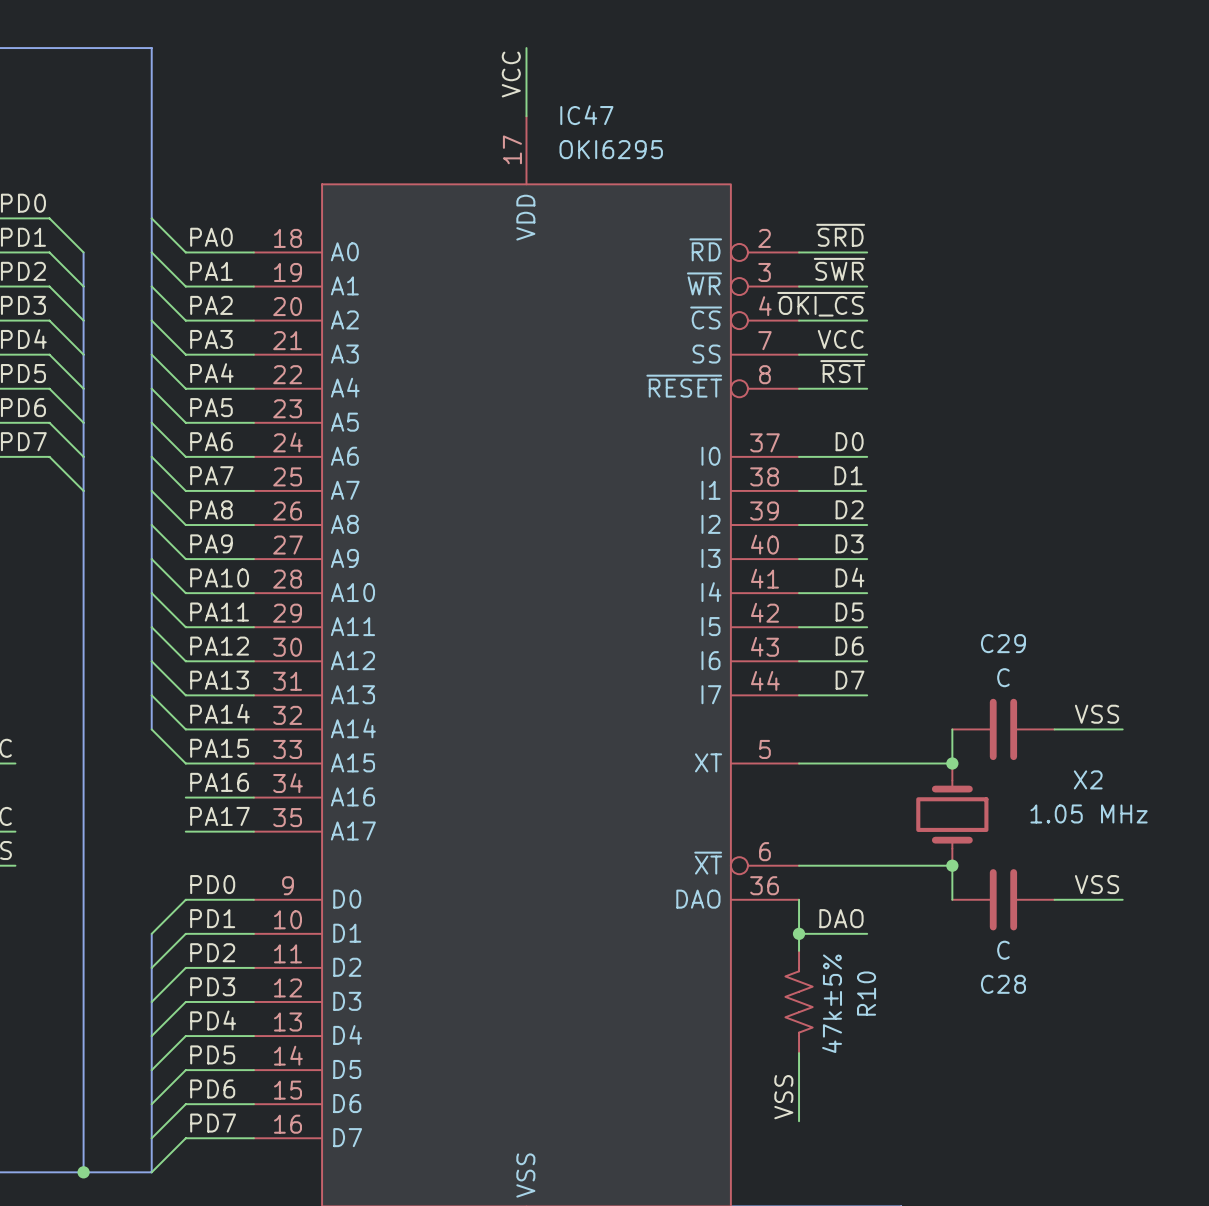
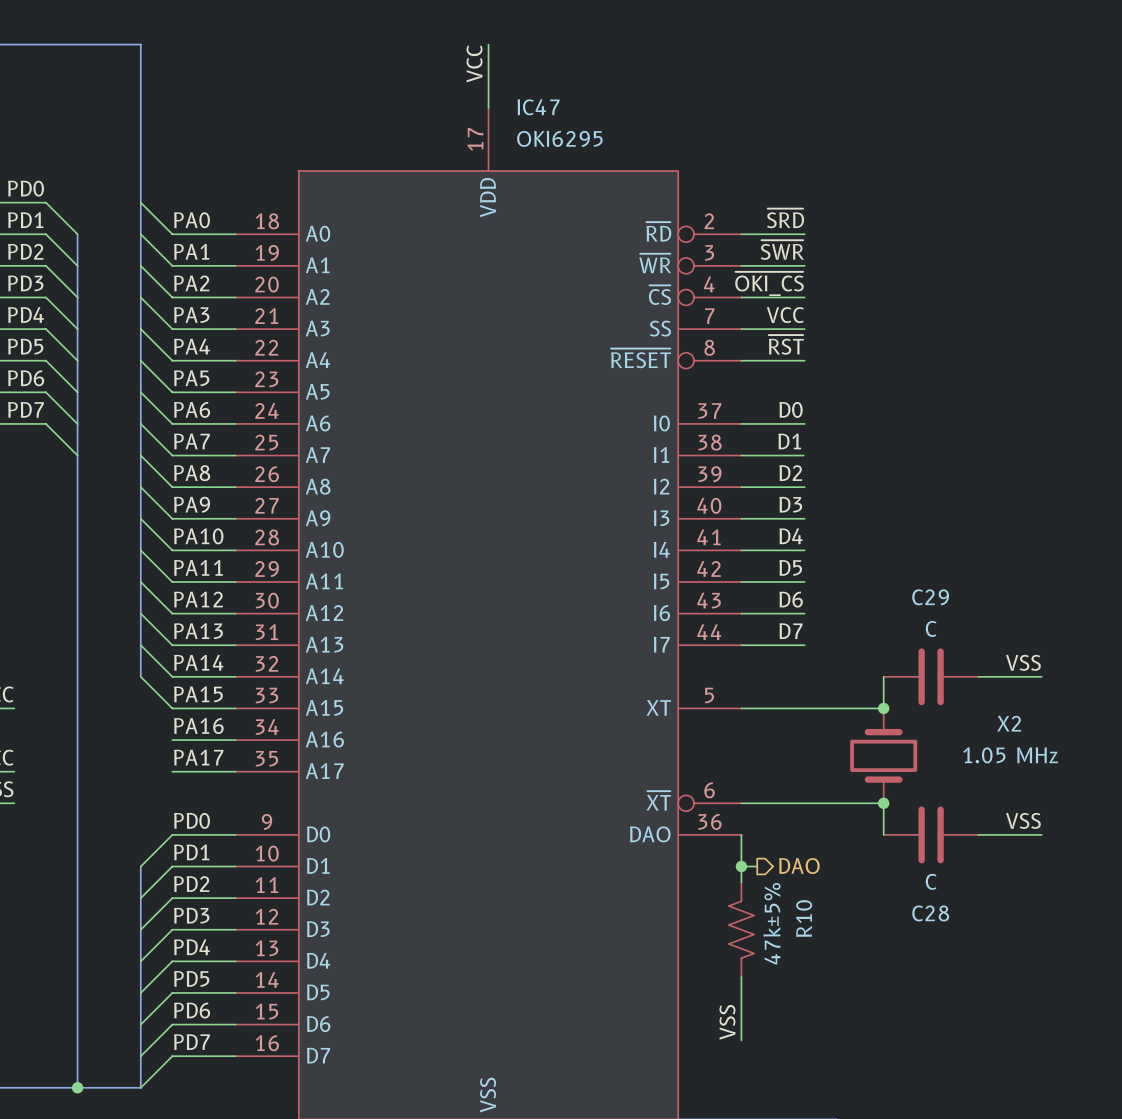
label: DAO (841, 918) -> none
wire: (816, 933) (867, 933) -> none
hierarchical label: none -> DAO (799, 866)

